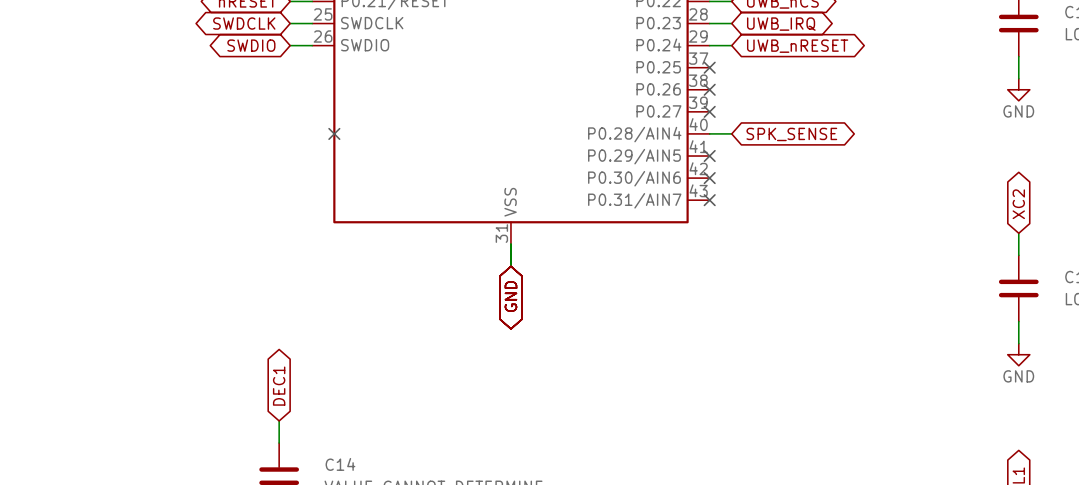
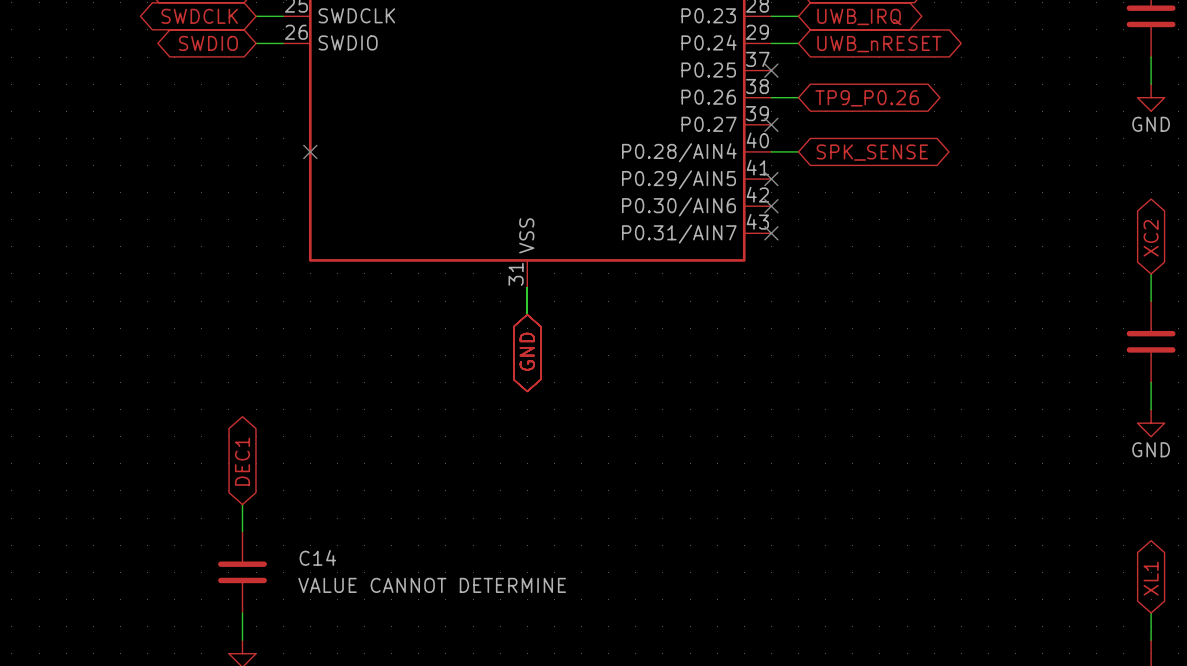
wire: none -> (771, 97) (798, 97)
no-connect mark: (709, 89) -> none
global label: none -> TP9_P0.26 (867, 98)

